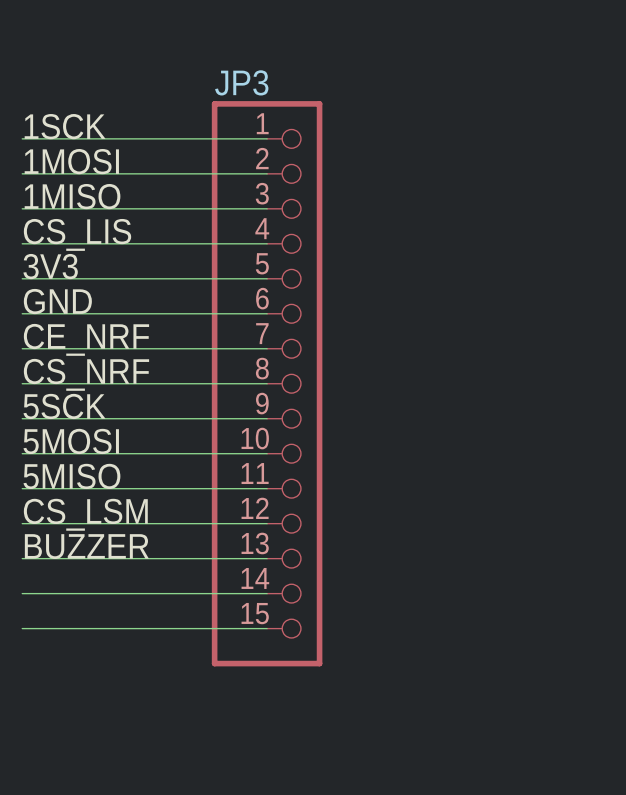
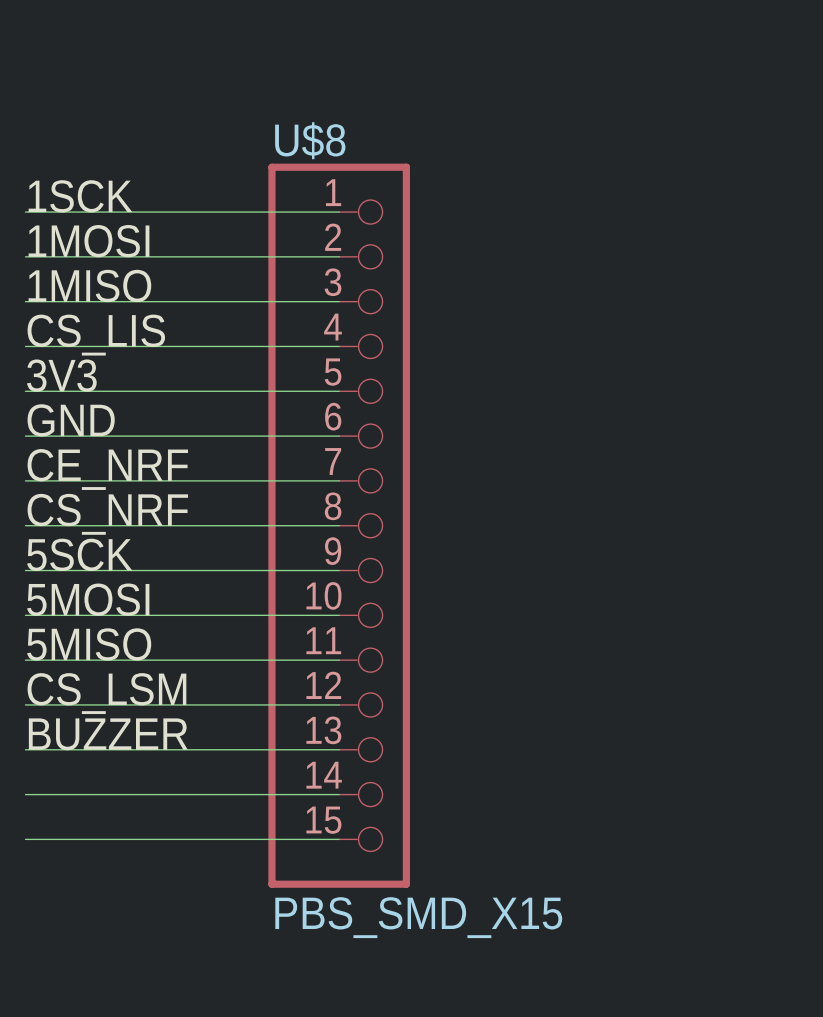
JP3 name: JP3 (241, 82) -> U$8 (310, 140)
JP3 value: none -> PBS_SMD_X15 (418, 917)

